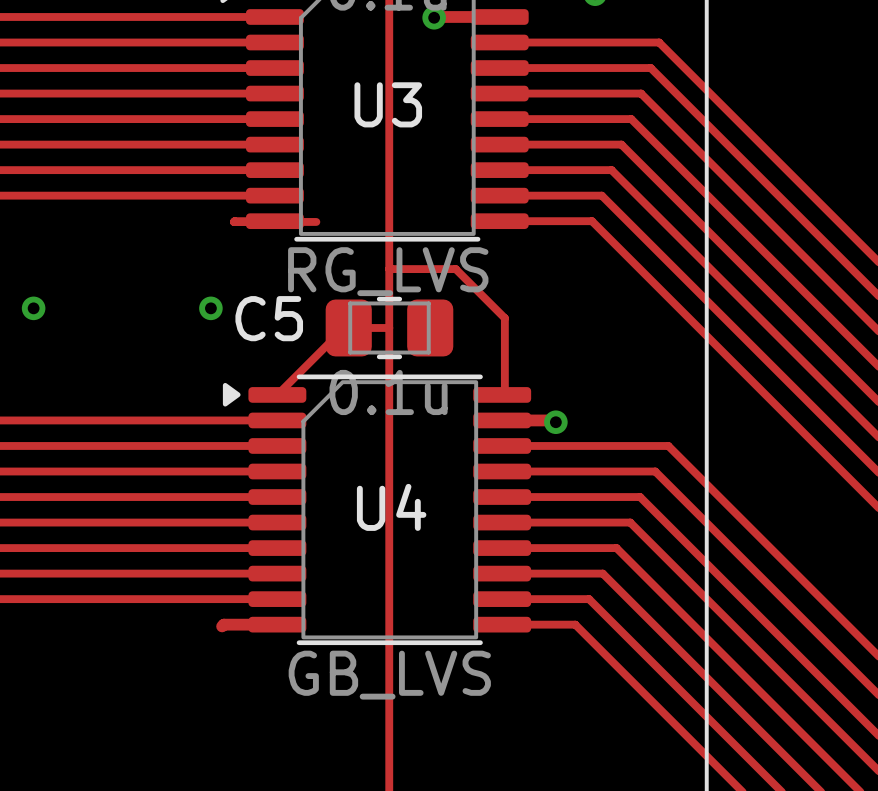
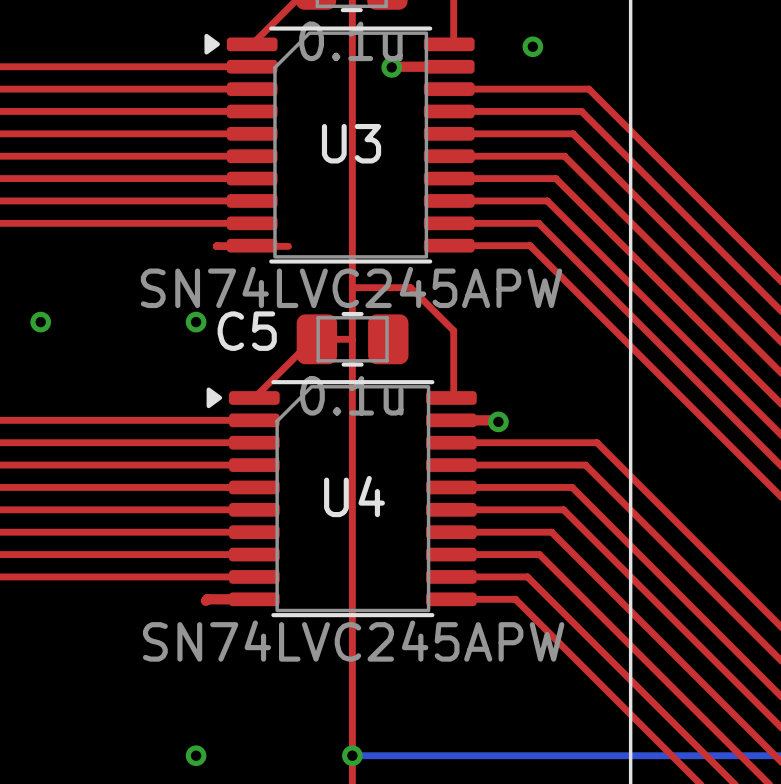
U3 value: RG_LVS (388, 271) -> SN74LVC245APW (351, 287)
U4 value: GB_LVS (389, 675) -> SN74LVC245APW (353, 641)

